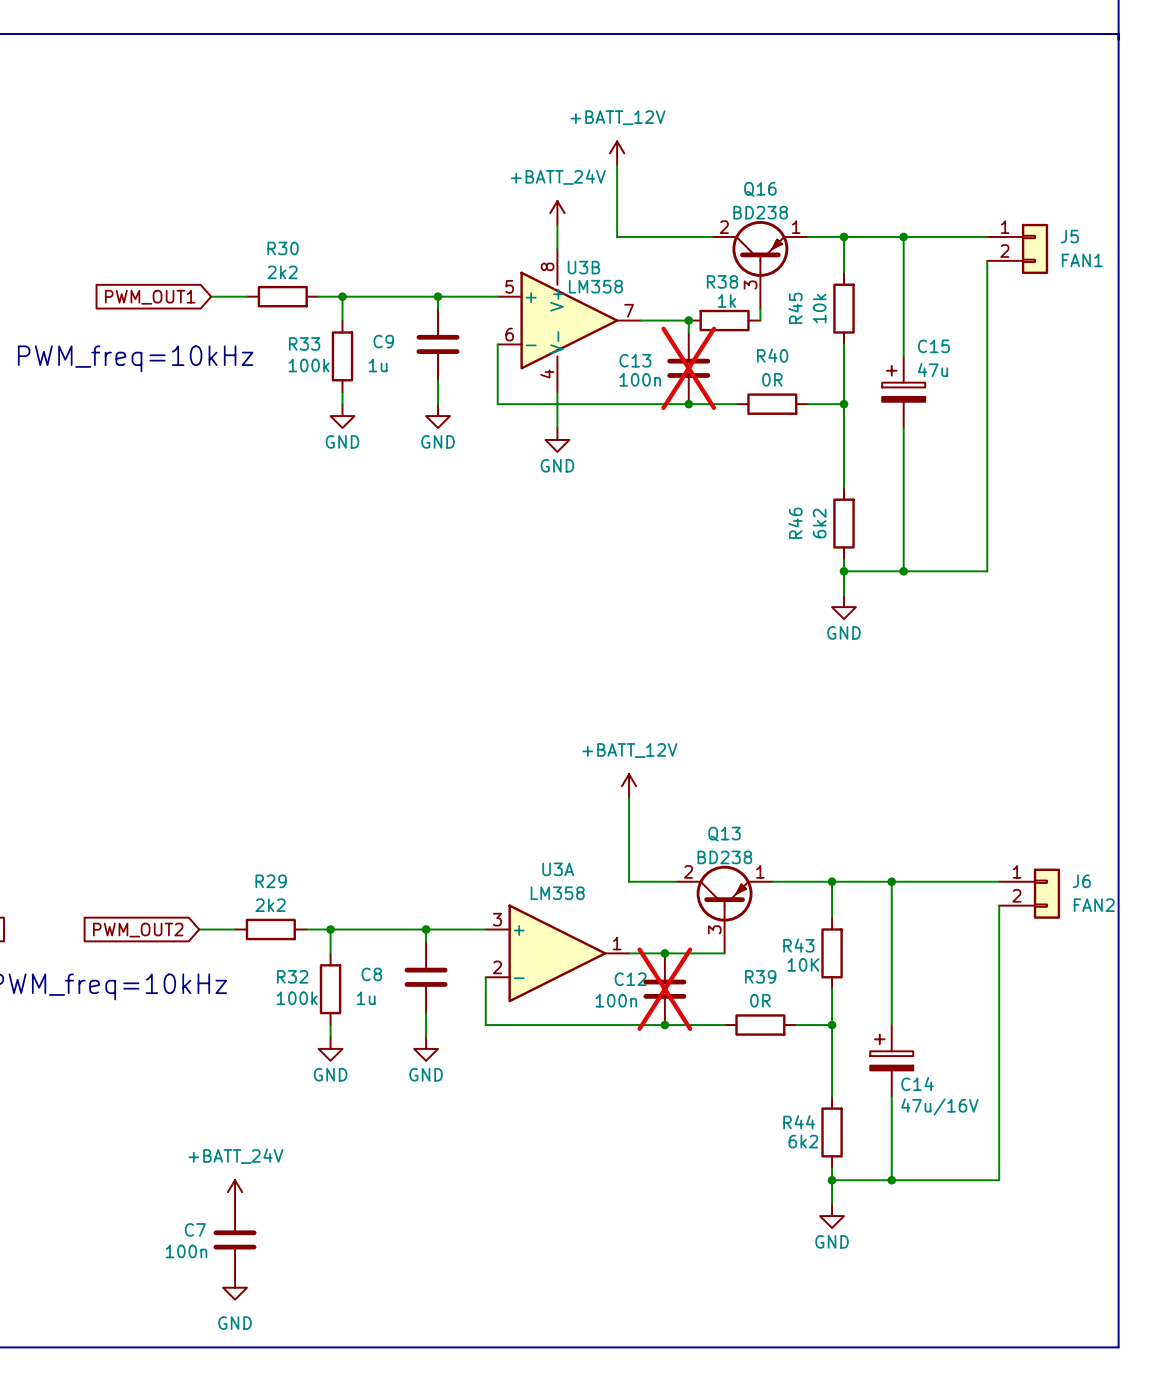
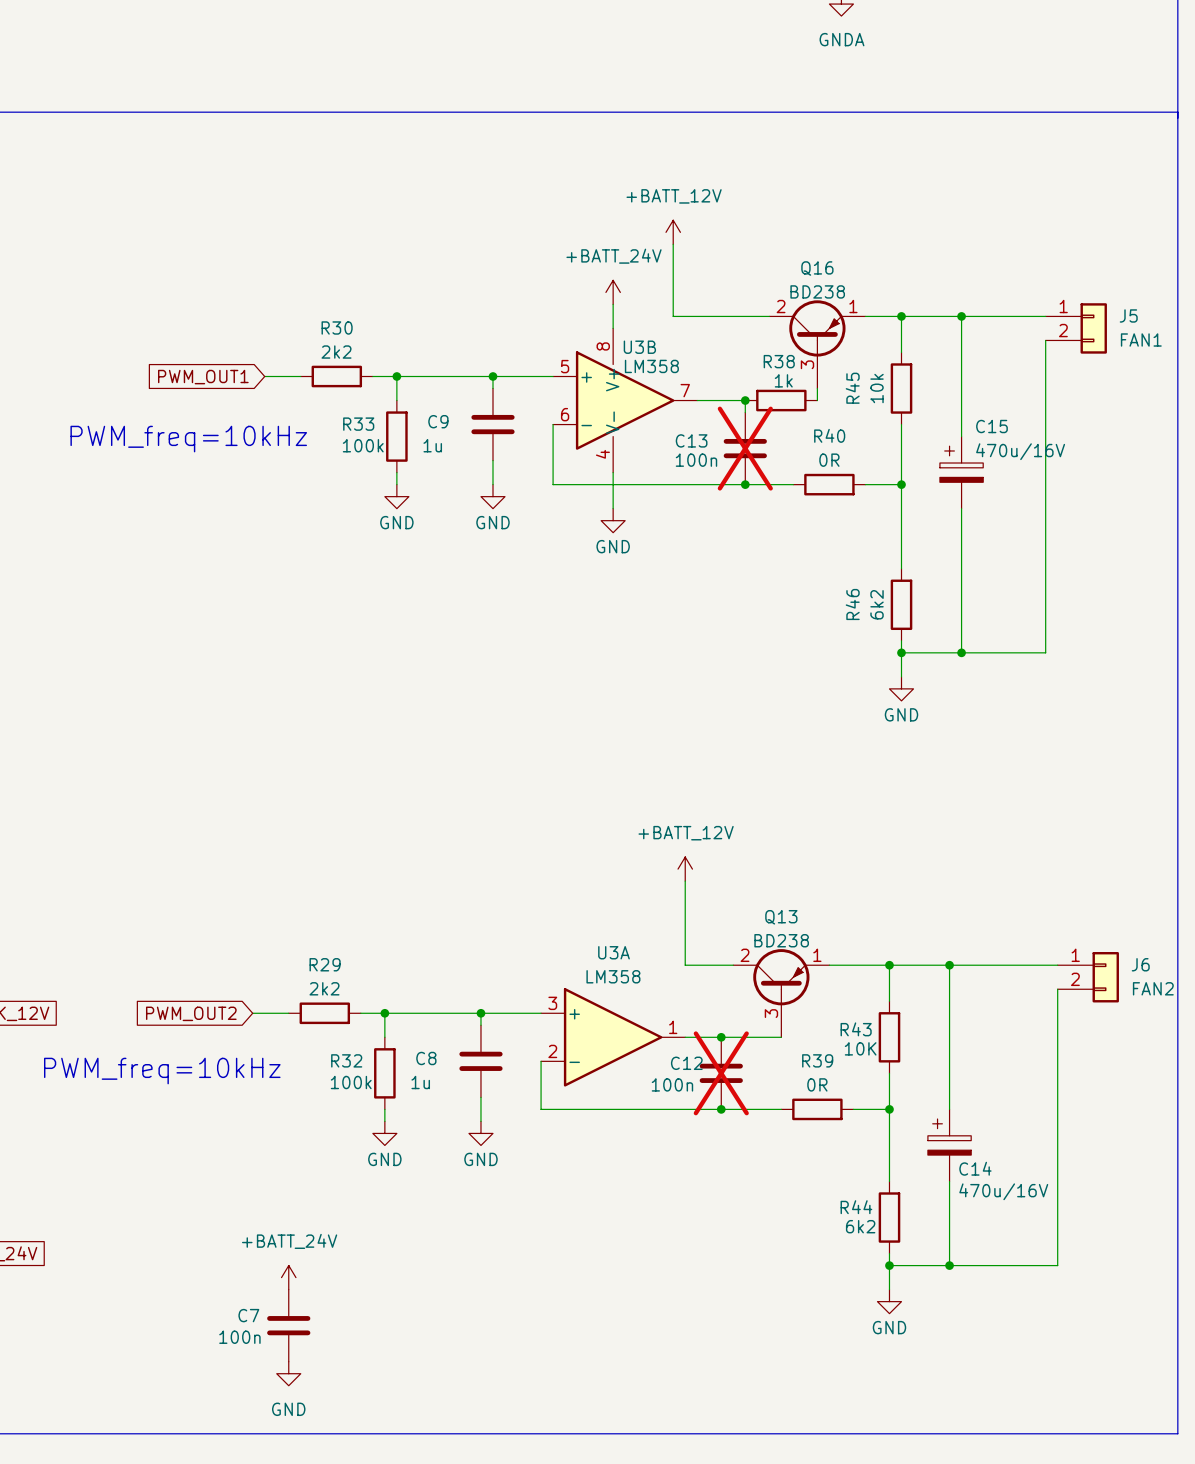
C15 value: 47u (933, 369) -> 470u/16V (1020, 451)
C14 value: 47u/16V (939, 1106) -> 470u/16V (1003, 1191)

